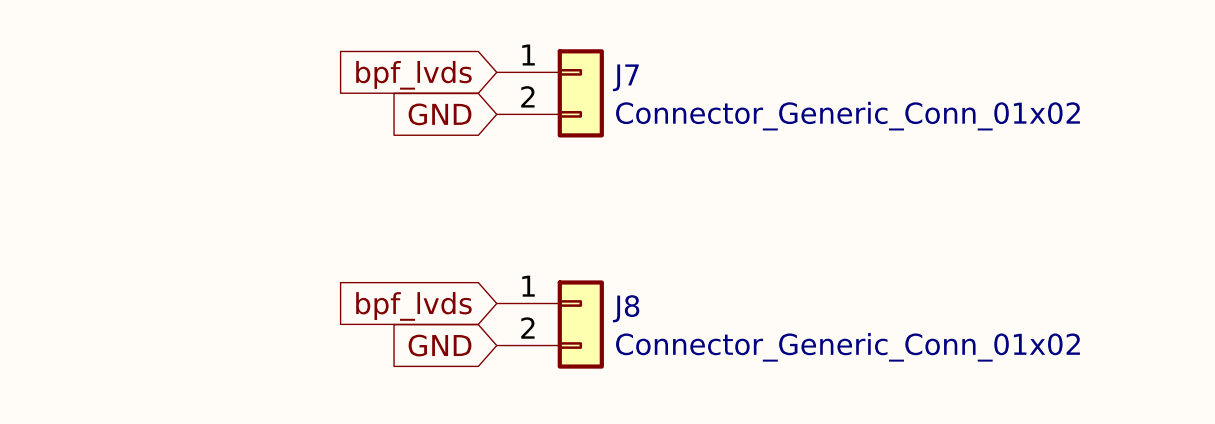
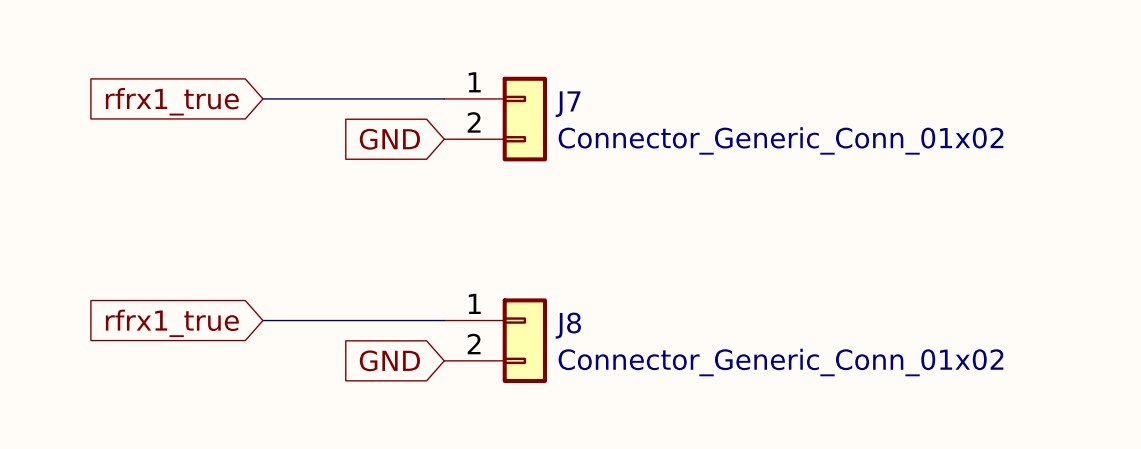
wire: none -> (262, 98) (444, 98)
global label: none -> rfrx1_true (172, 101)
global label: bpf_lvds (413, 75) -> none
wire: none -> (262, 320) (444, 320)
global label: none -> rfrx1_true (172, 323)
global label: bpf_lvds (413, 306) -> none

